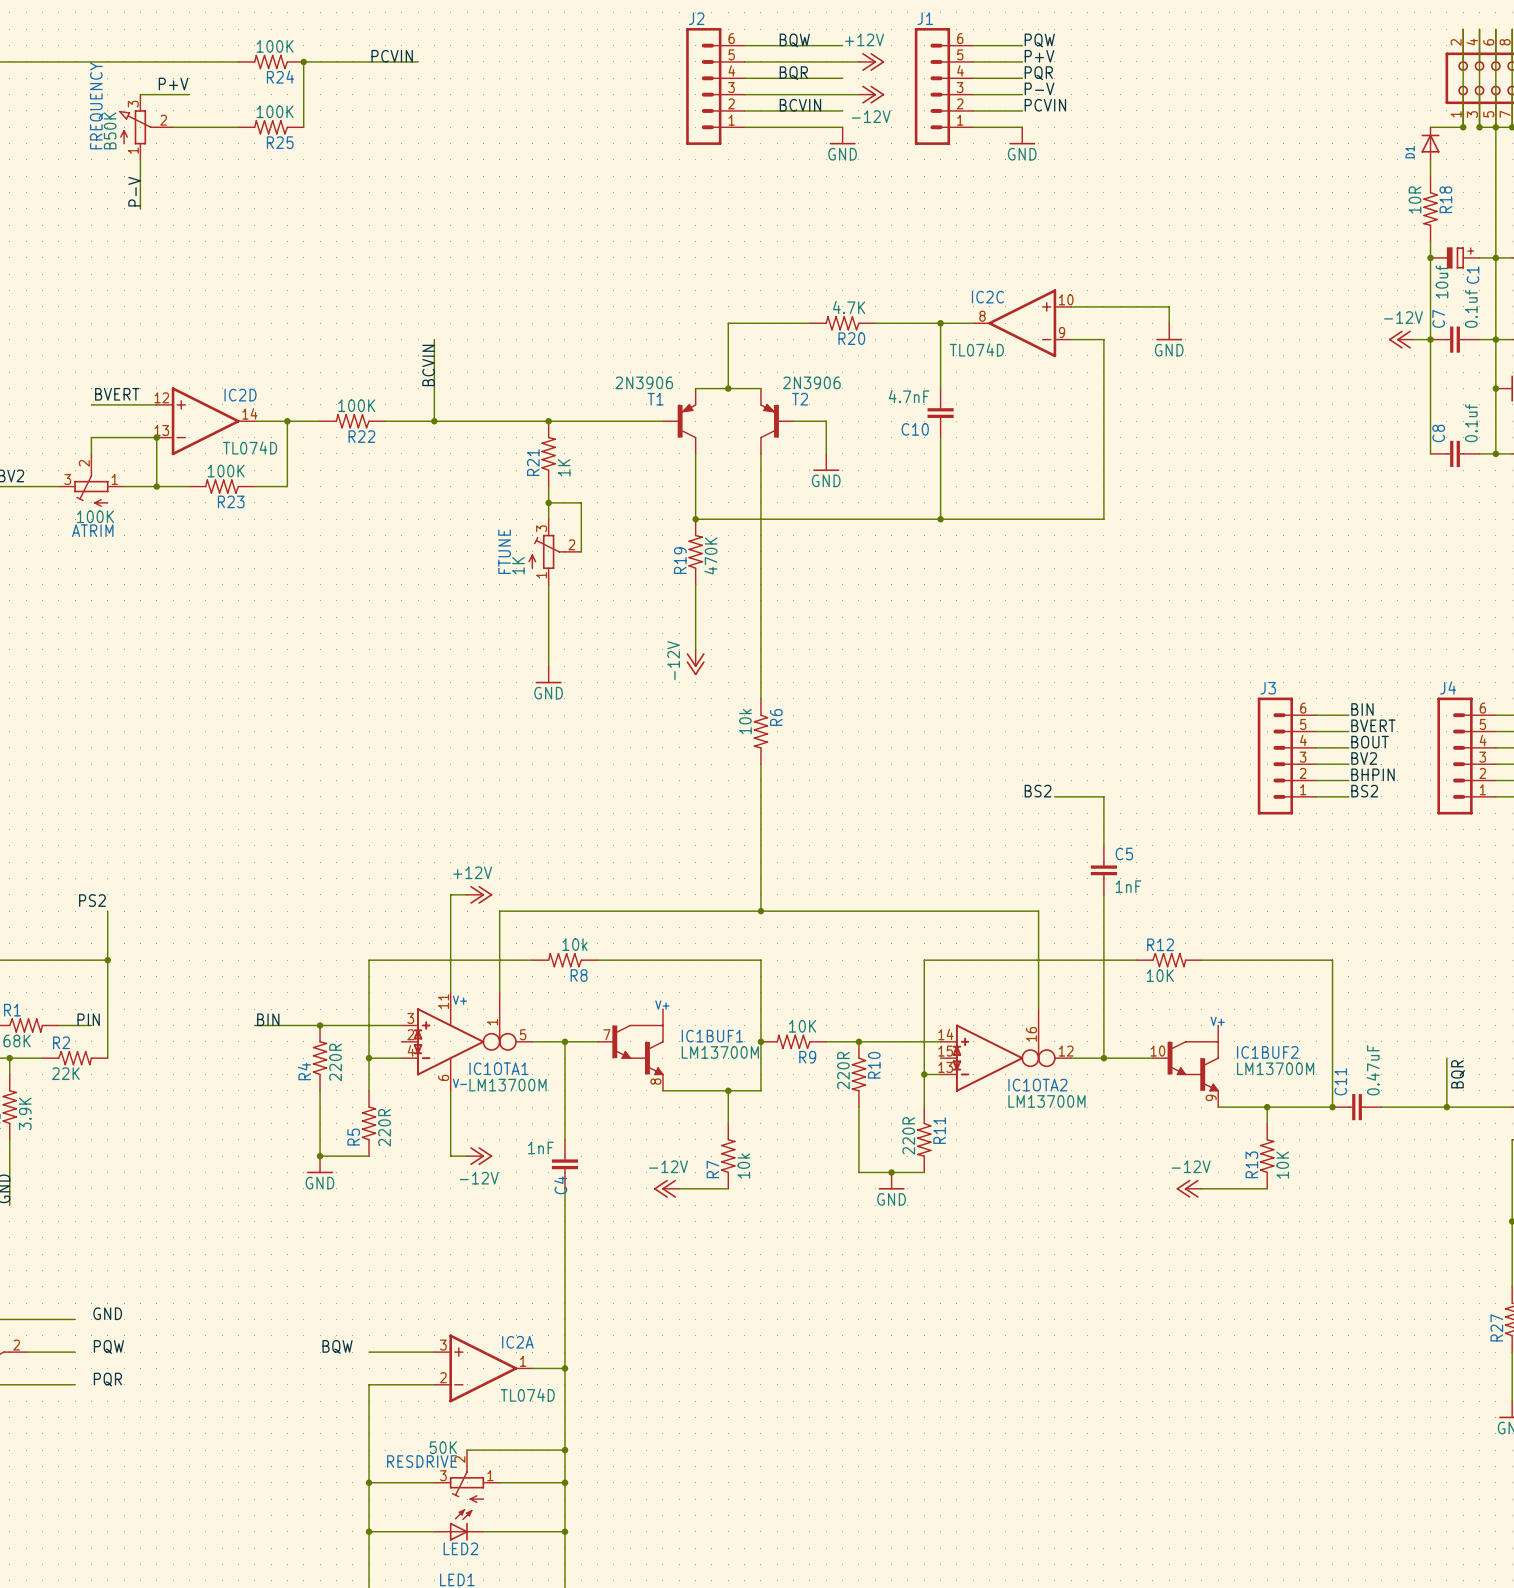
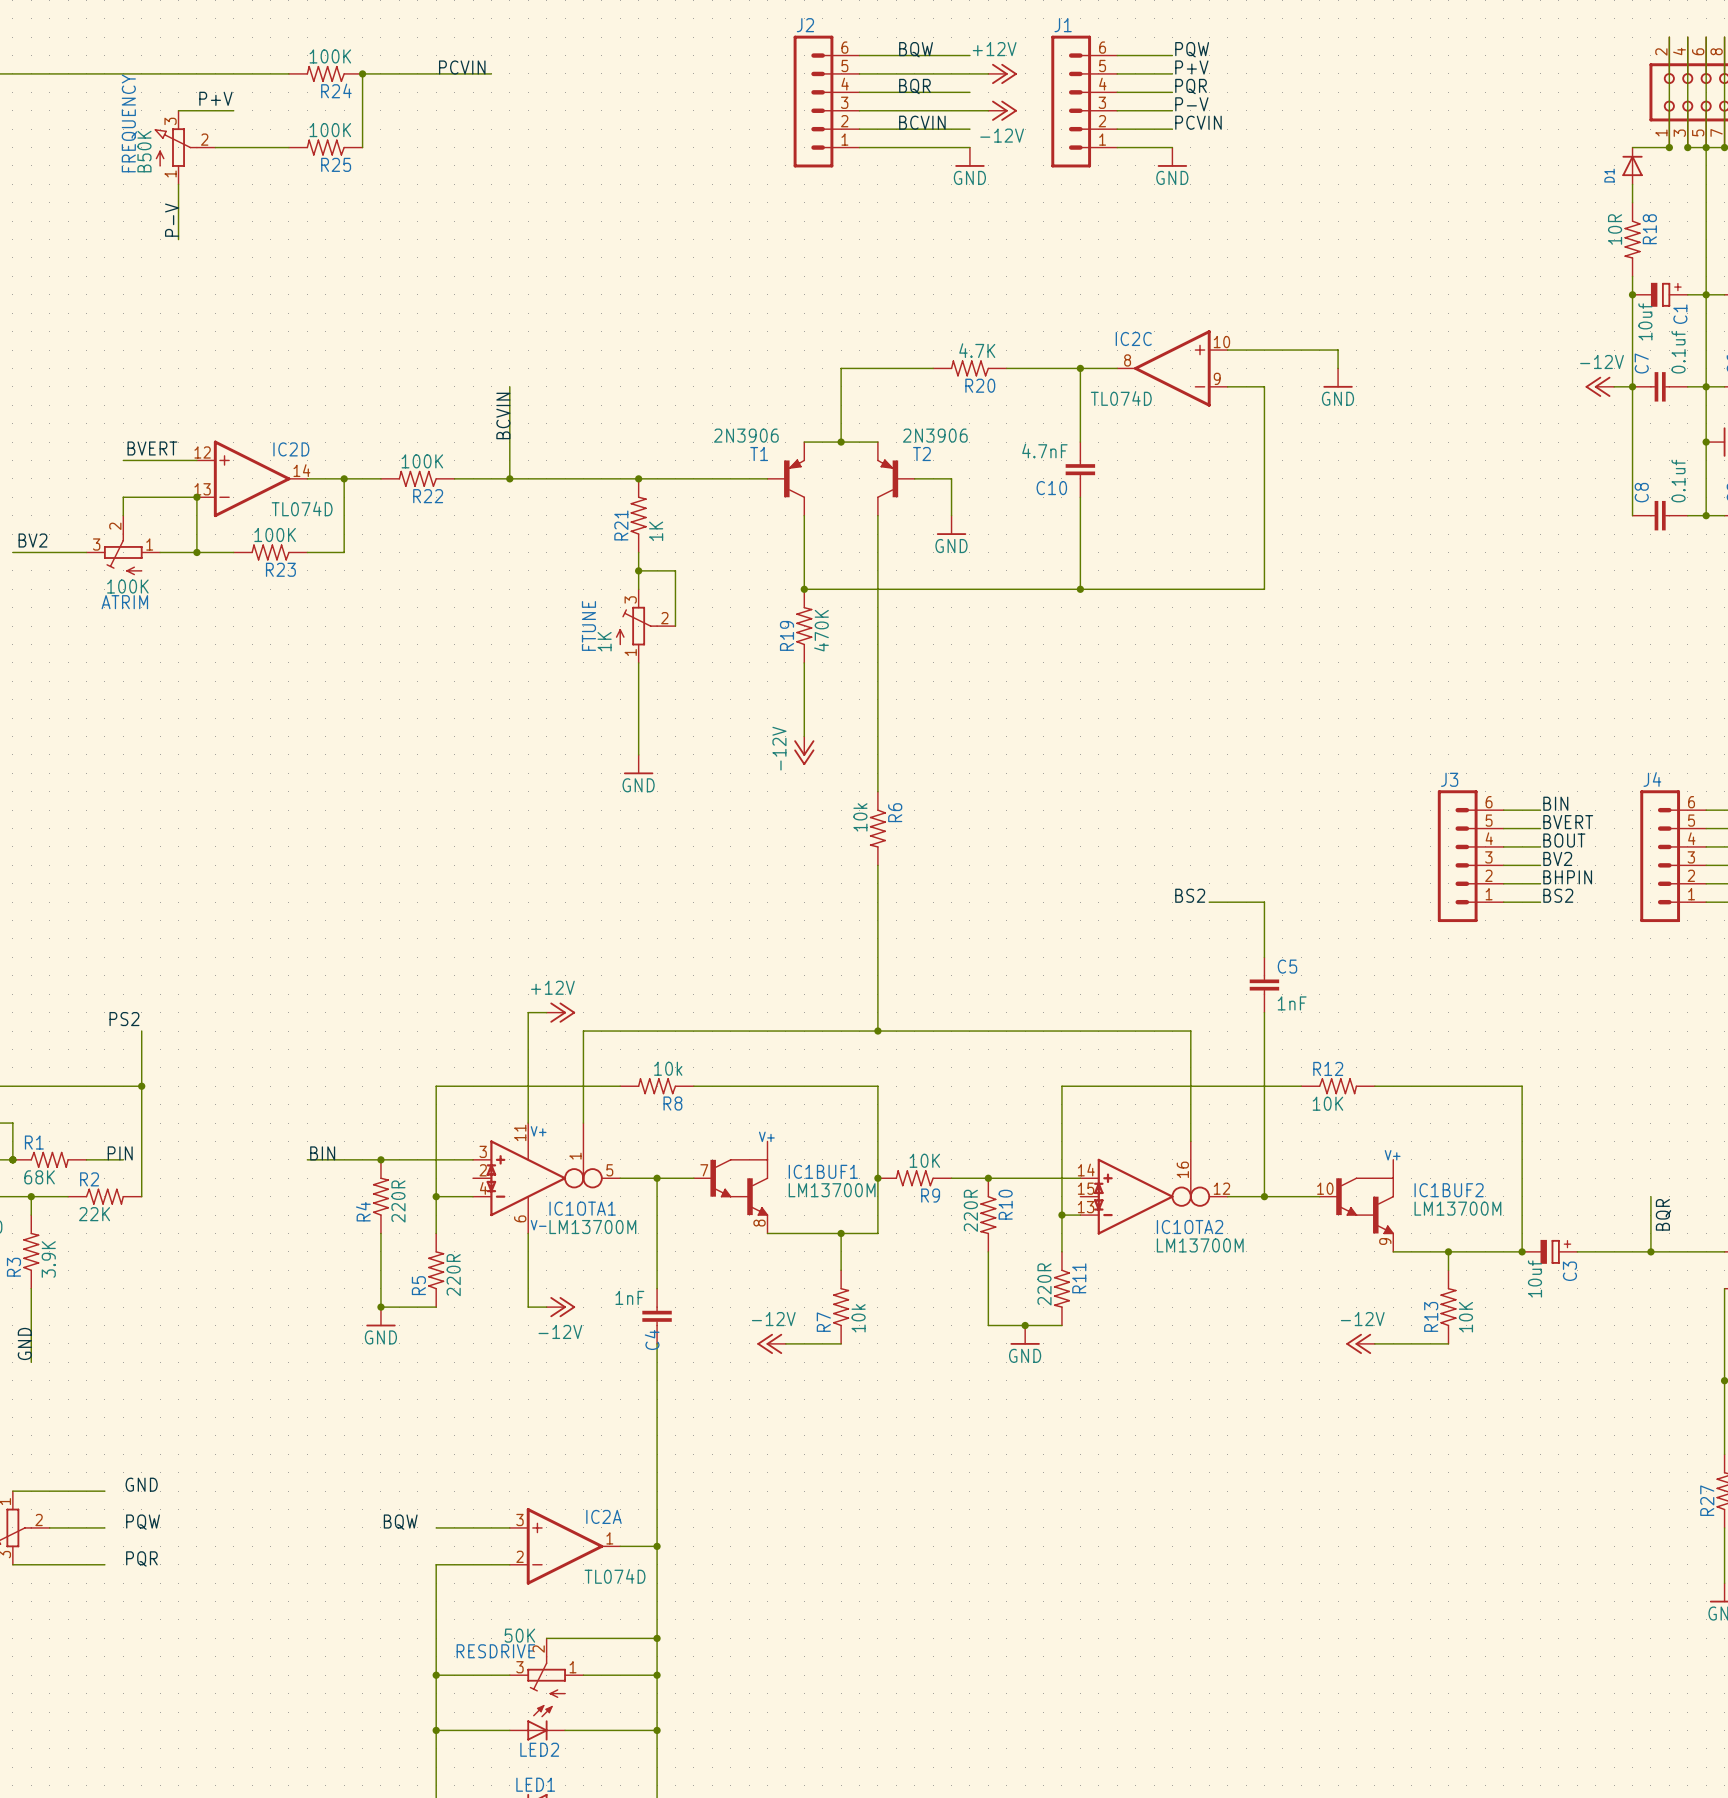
C11: 0.47uF (1357, 1107) -> none
C3: none -> 10uf (1549, 1251)

